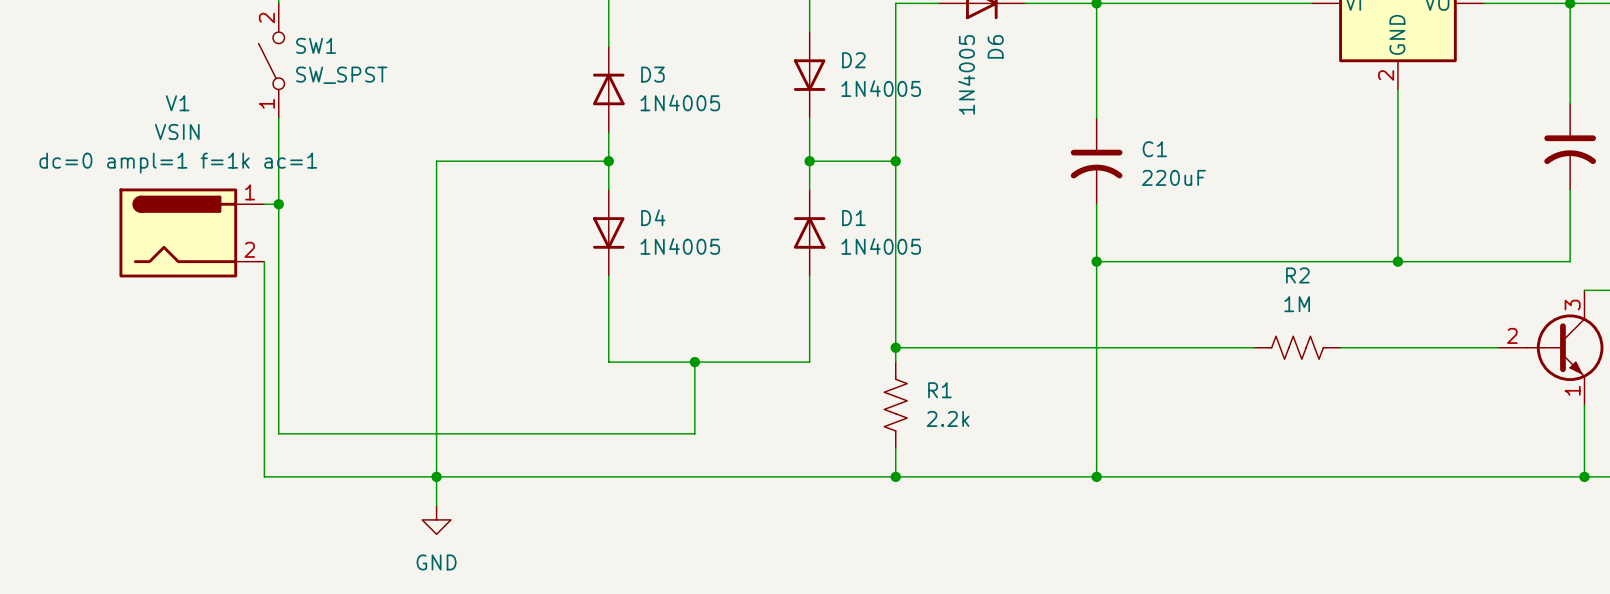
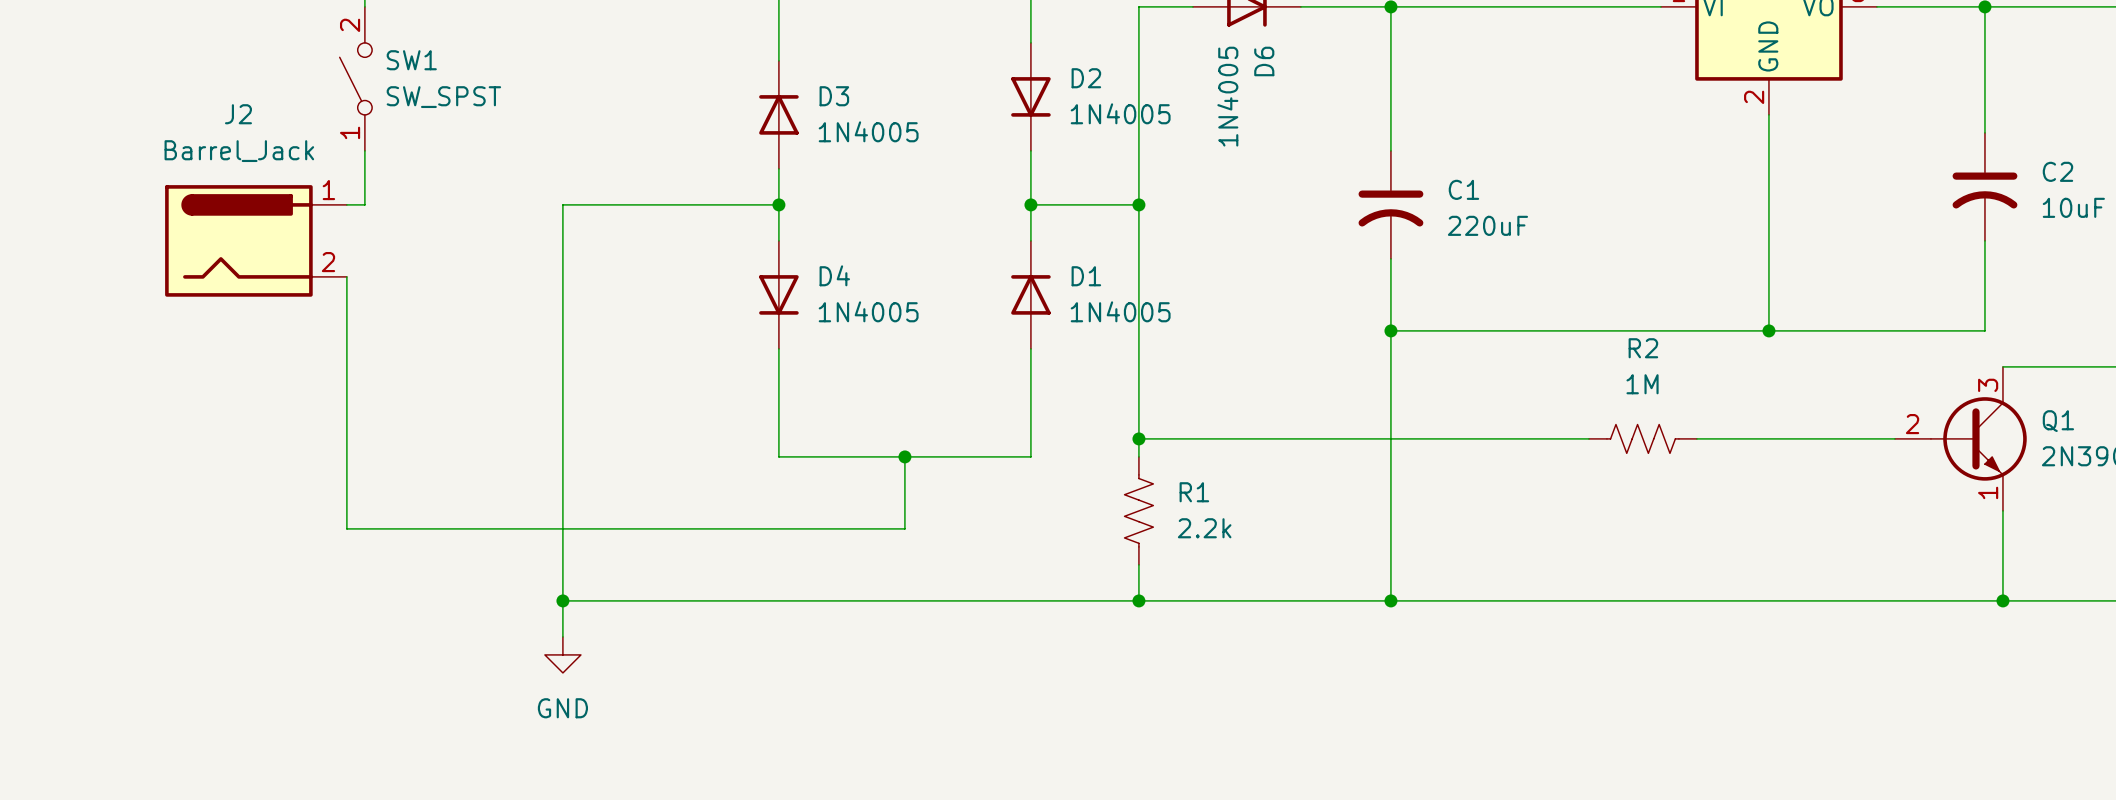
wire: (278, 161) (278, 433) (694, 433) (694, 362) -> (364, 204) (346, 204)
J2: none -> Barrel_Jack (256, 240)
wire: (264, 204) (278, 204) -> none
junction: (278, 204) -> none
wire: none -> (346, 276) (346, 330)
V1: VSIN (191, 232) -> none
junction position: (694, 362) -> (904, 456)
wire: (264, 419) (264, 476) (436, 476) -> (346, 528) (904, 528) (904, 456)

